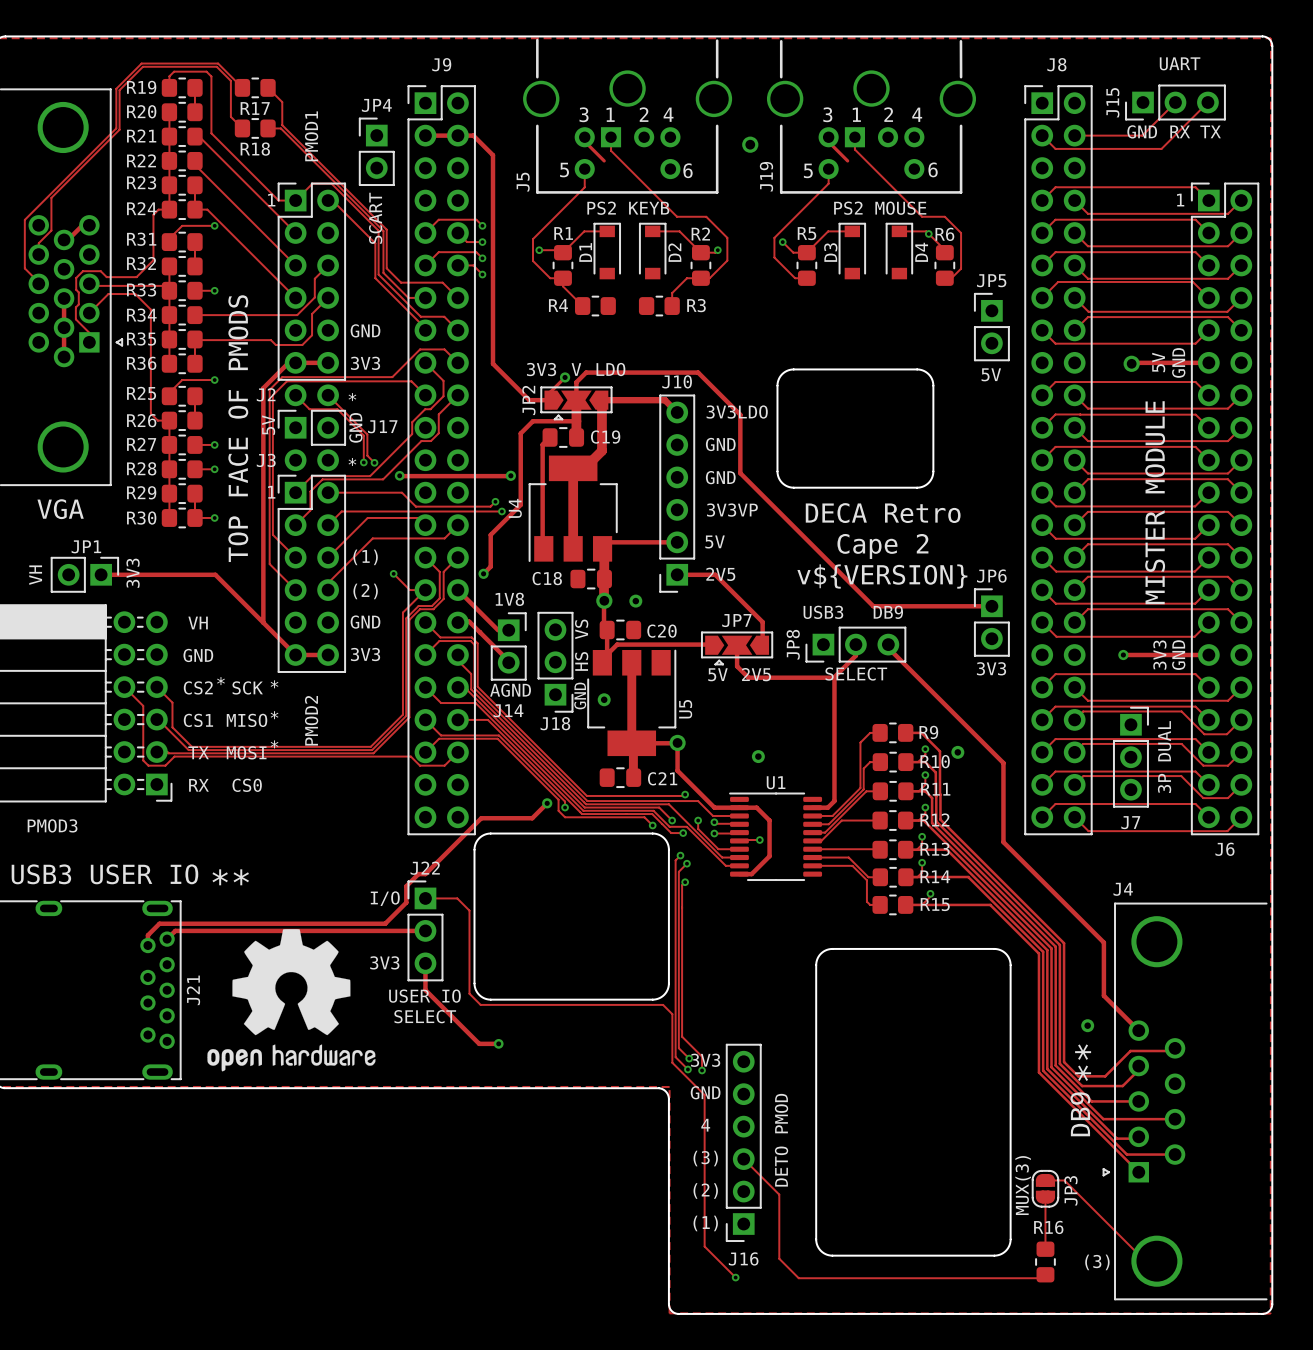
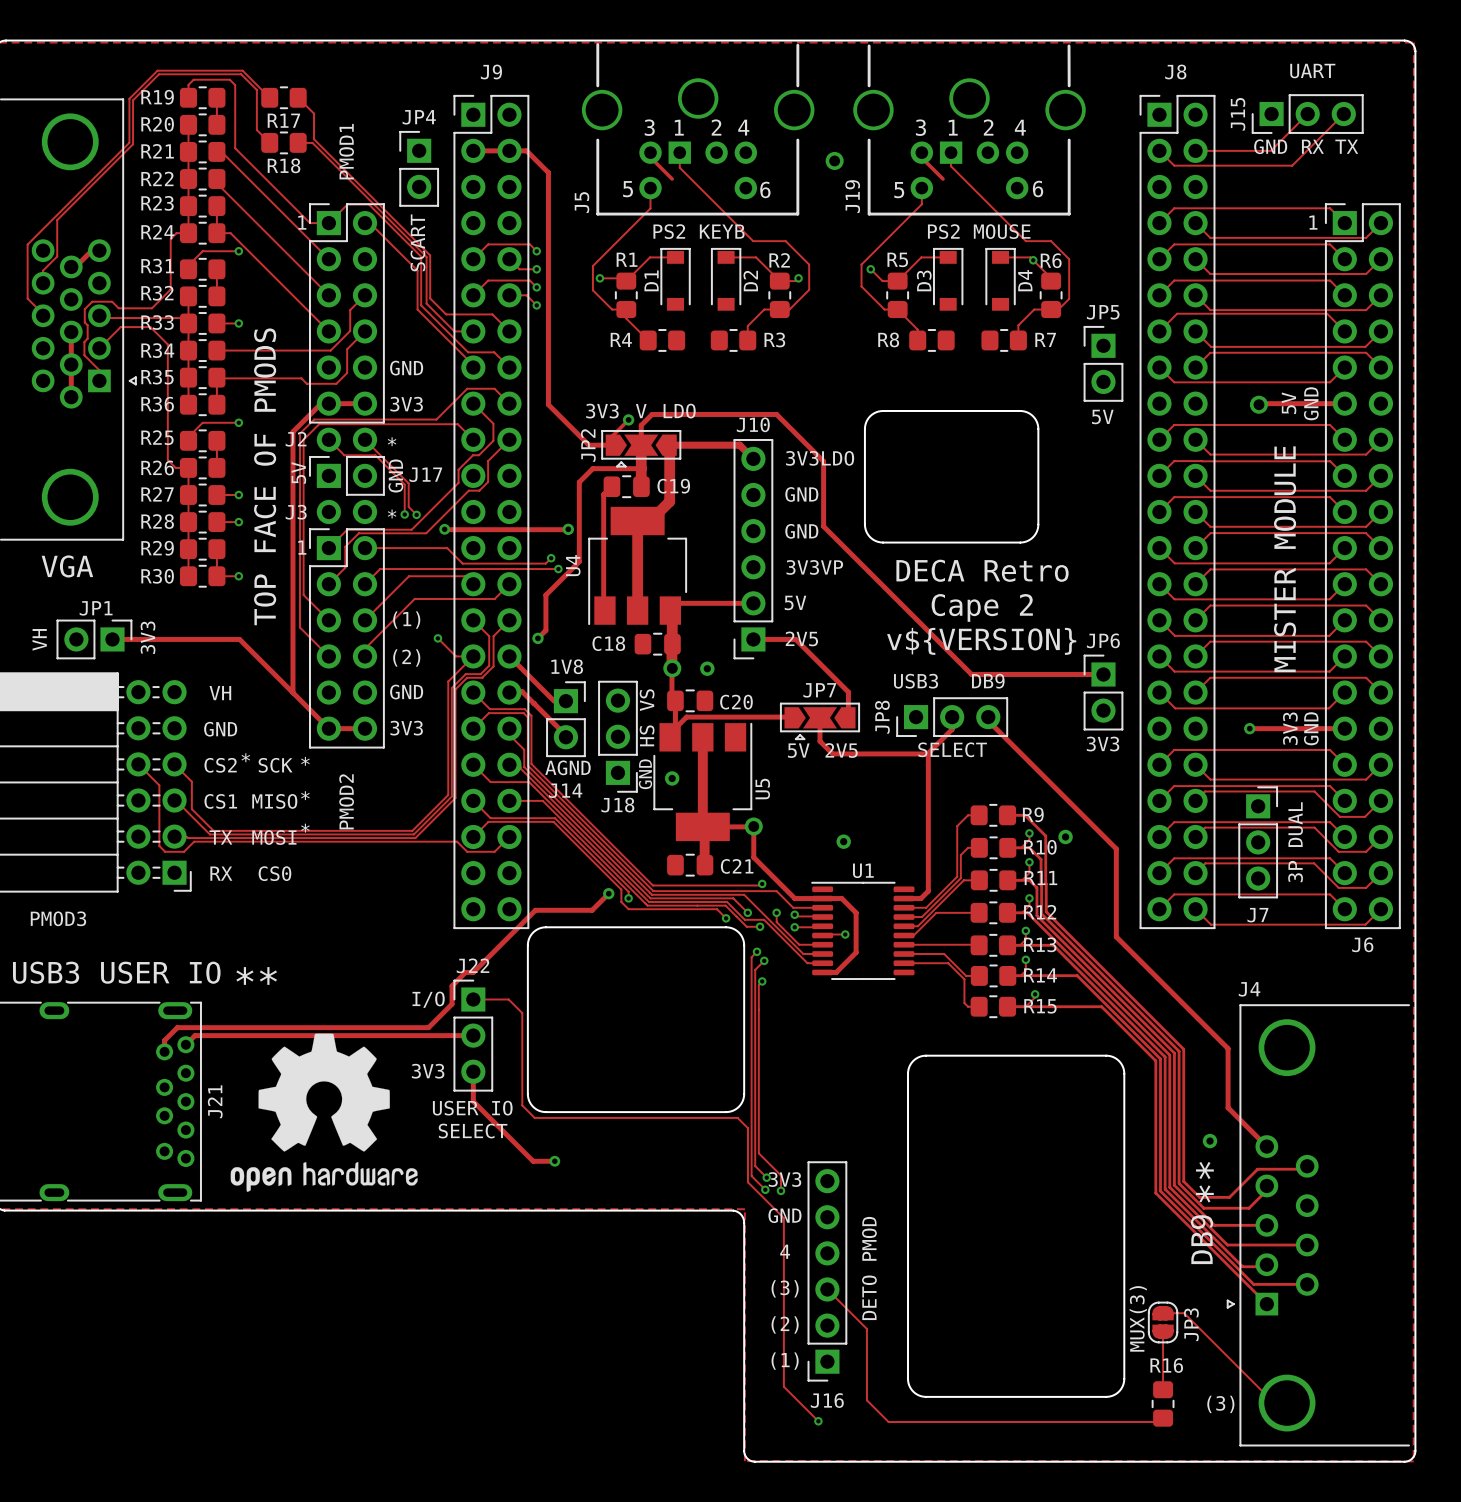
track: none -> (897, 309) (917, 329) (917, 340)
track: none -> (1051, 309) (1034, 309) (1018, 325) (1018, 340)
R8: none -> (931, 340)
R7: none -> (1004, 340)

